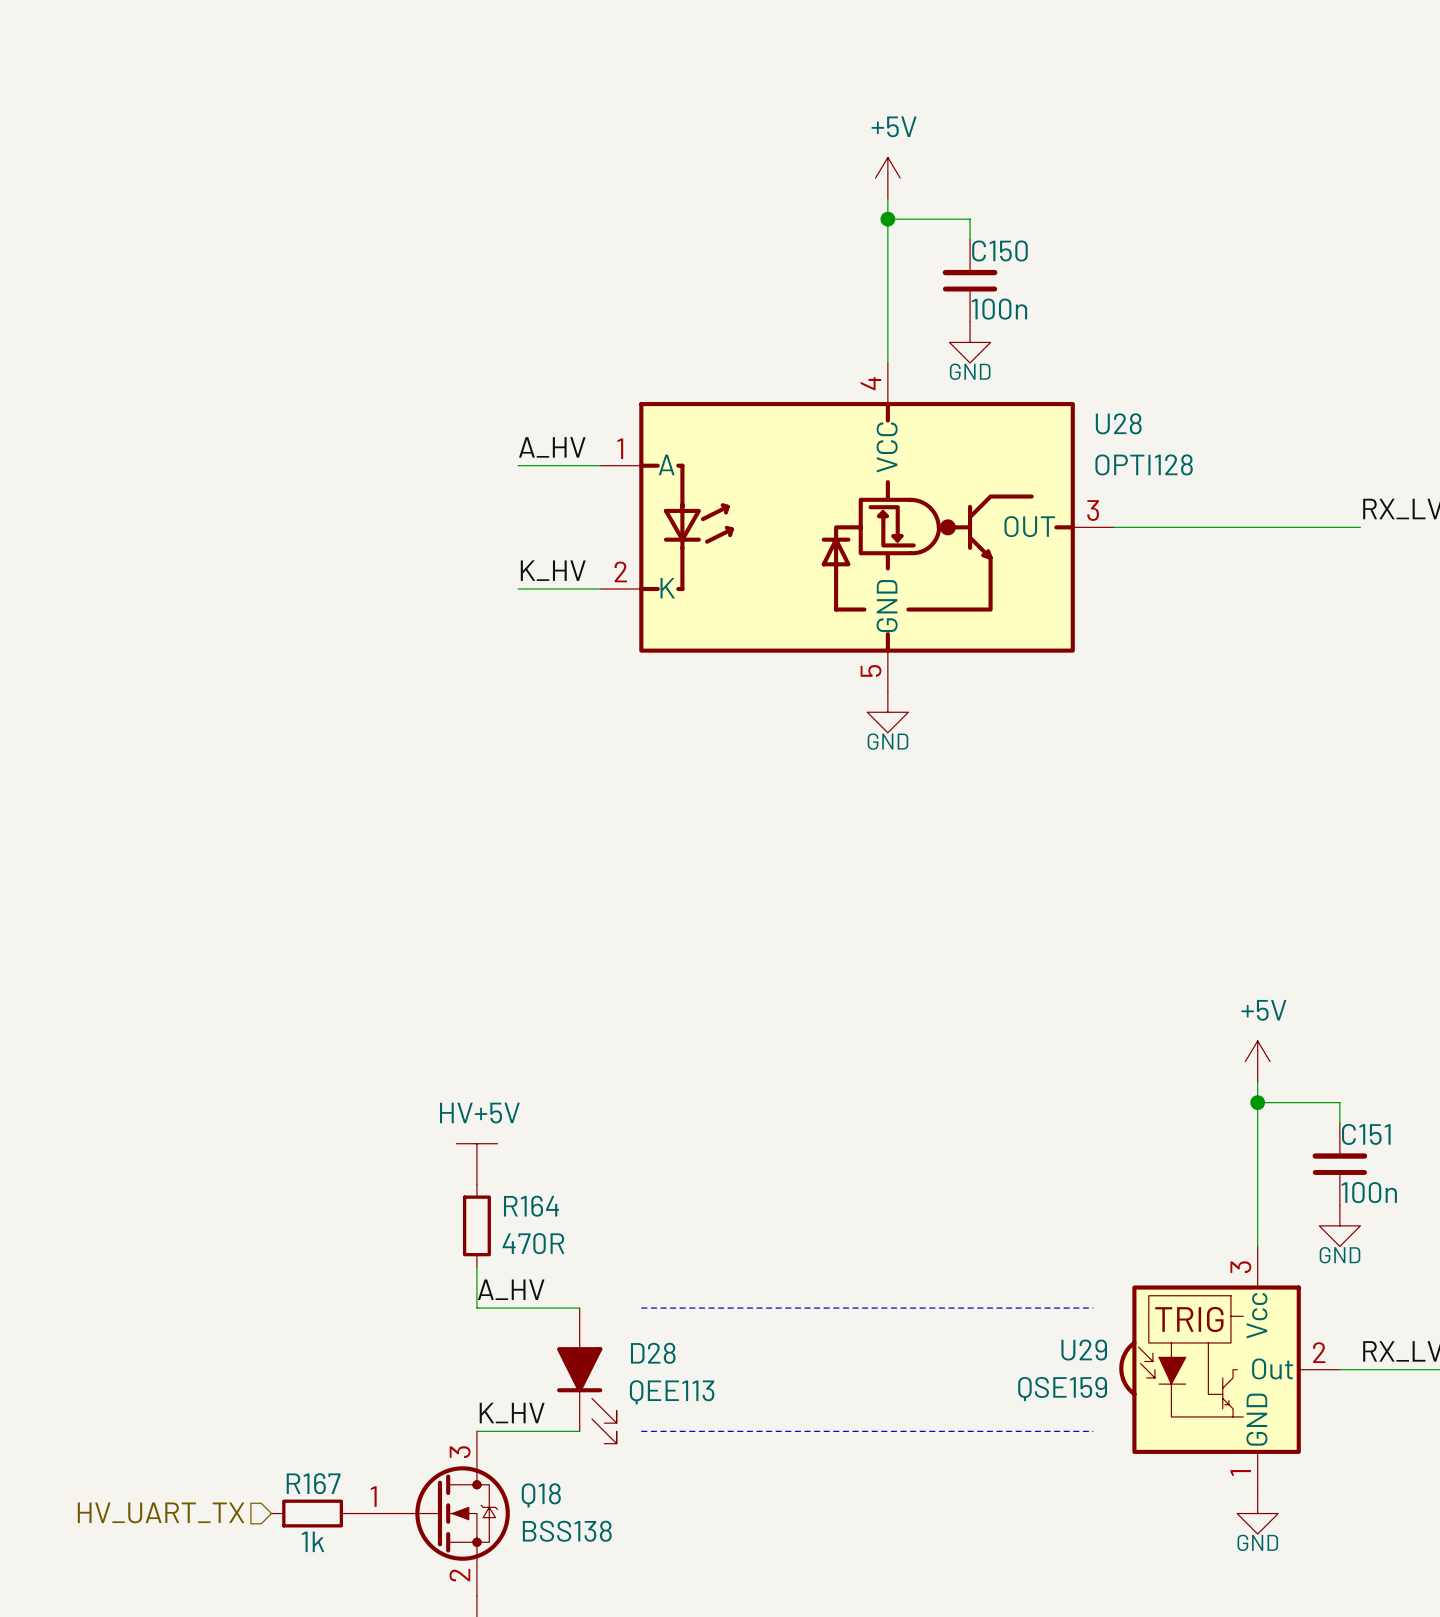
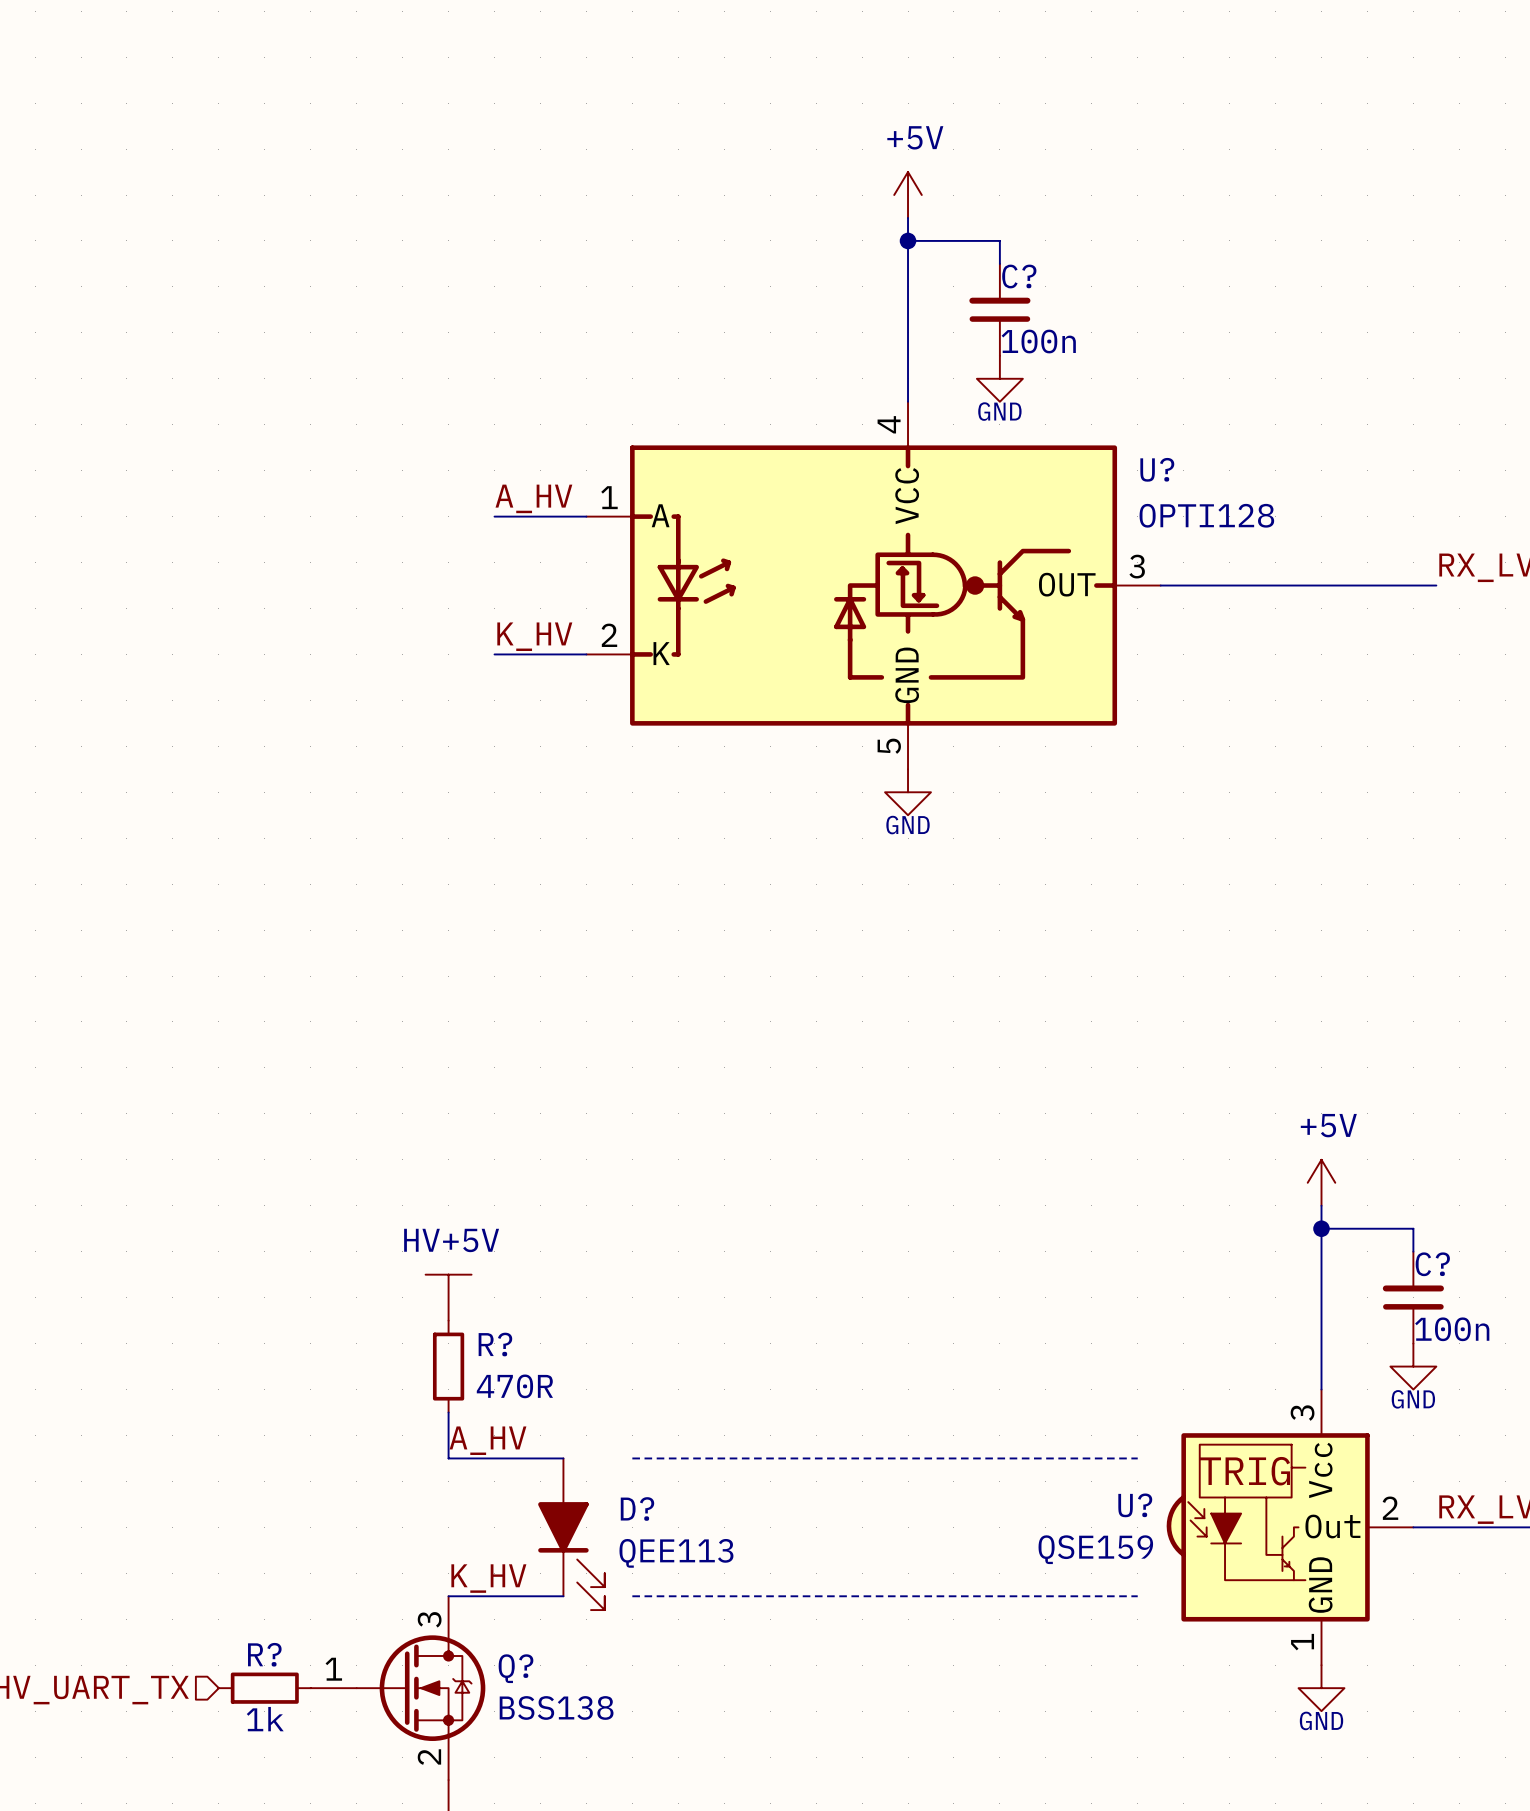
C150 name: C150 (999, 250) -> C? (1019, 276)
U28 name: U28 (1118, 423) -> U? (1157, 469)
C151 name: C151 (1366, 1134) -> C? (1432, 1264)
R164 name: R164 (531, 1206) -> R? (495, 1344)
U29 name: U29 (1084, 1350) -> U? (1135, 1505)
D28 name: D28 (653, 1353) -> D? (637, 1508)
R167 name: R167 (313, 1483) -> R? (264, 1654)
Q18 name: Q18 (541, 1495) -> Q? (516, 1668)

